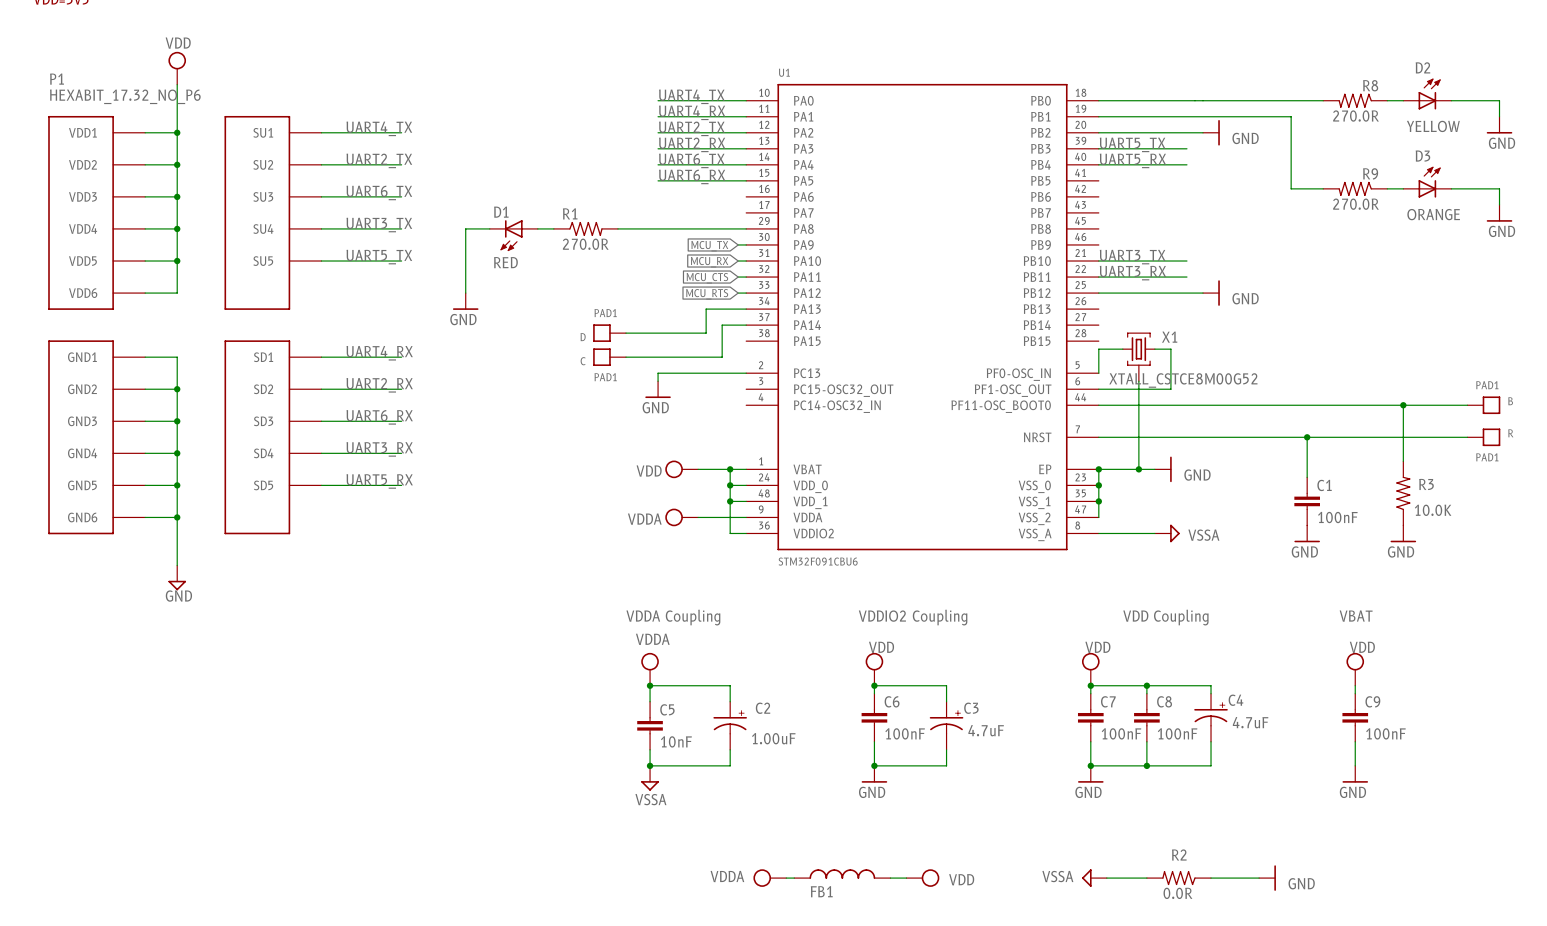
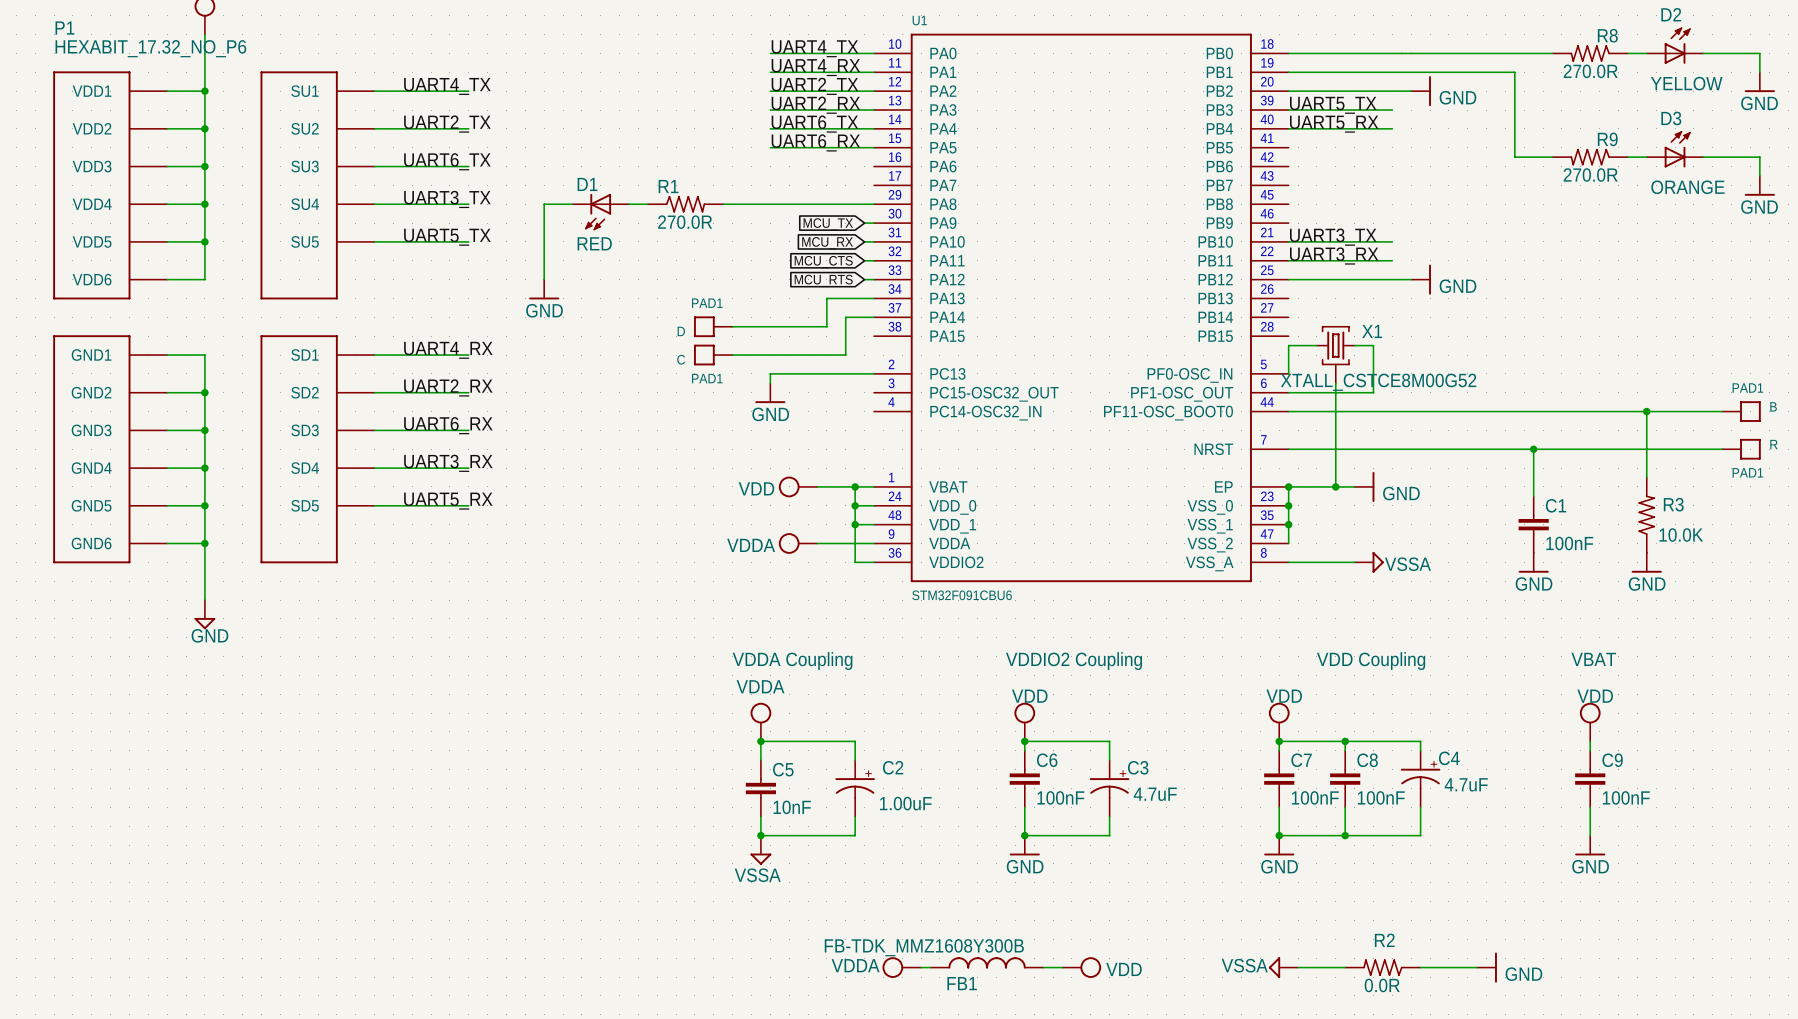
FB1 value: none -> FB-TDK_MMZ1608Y300B (924, 947)

